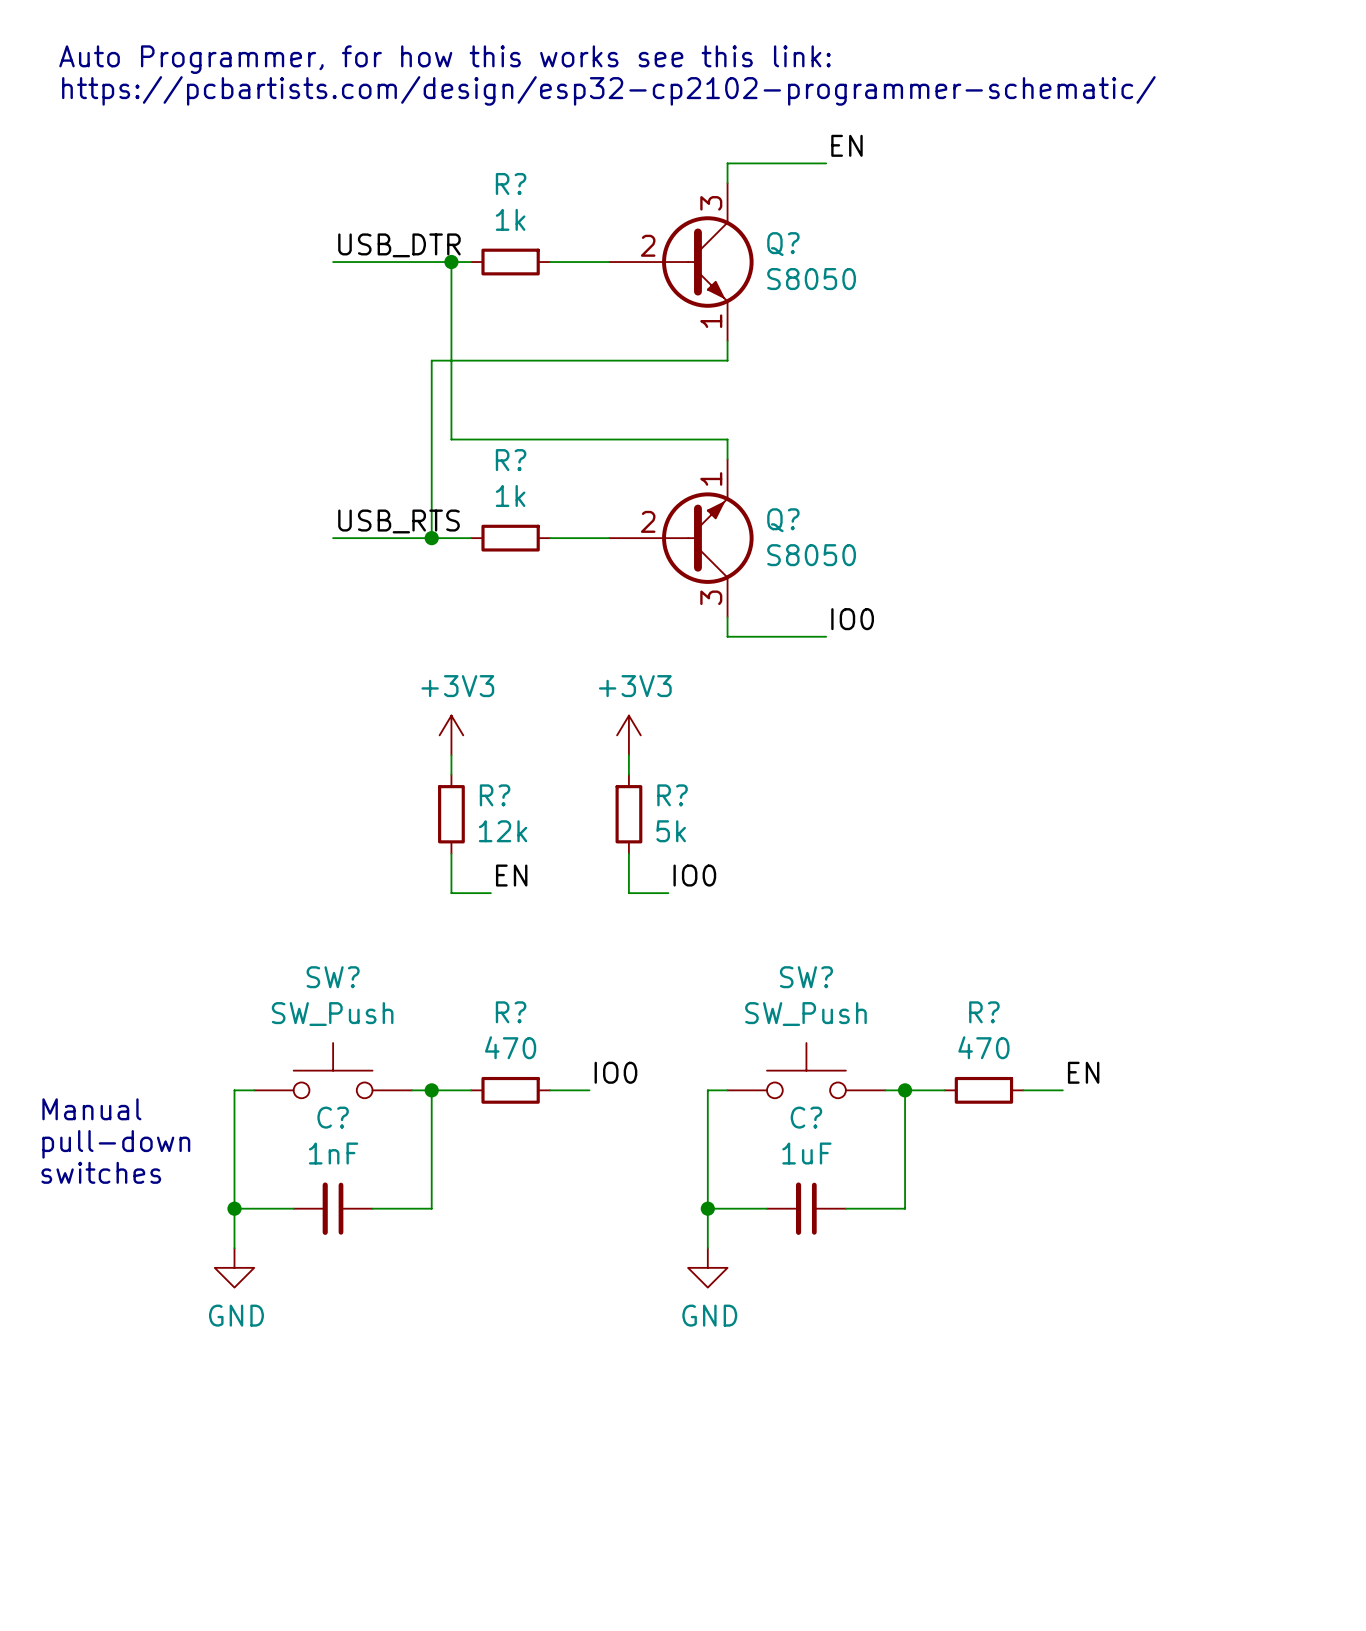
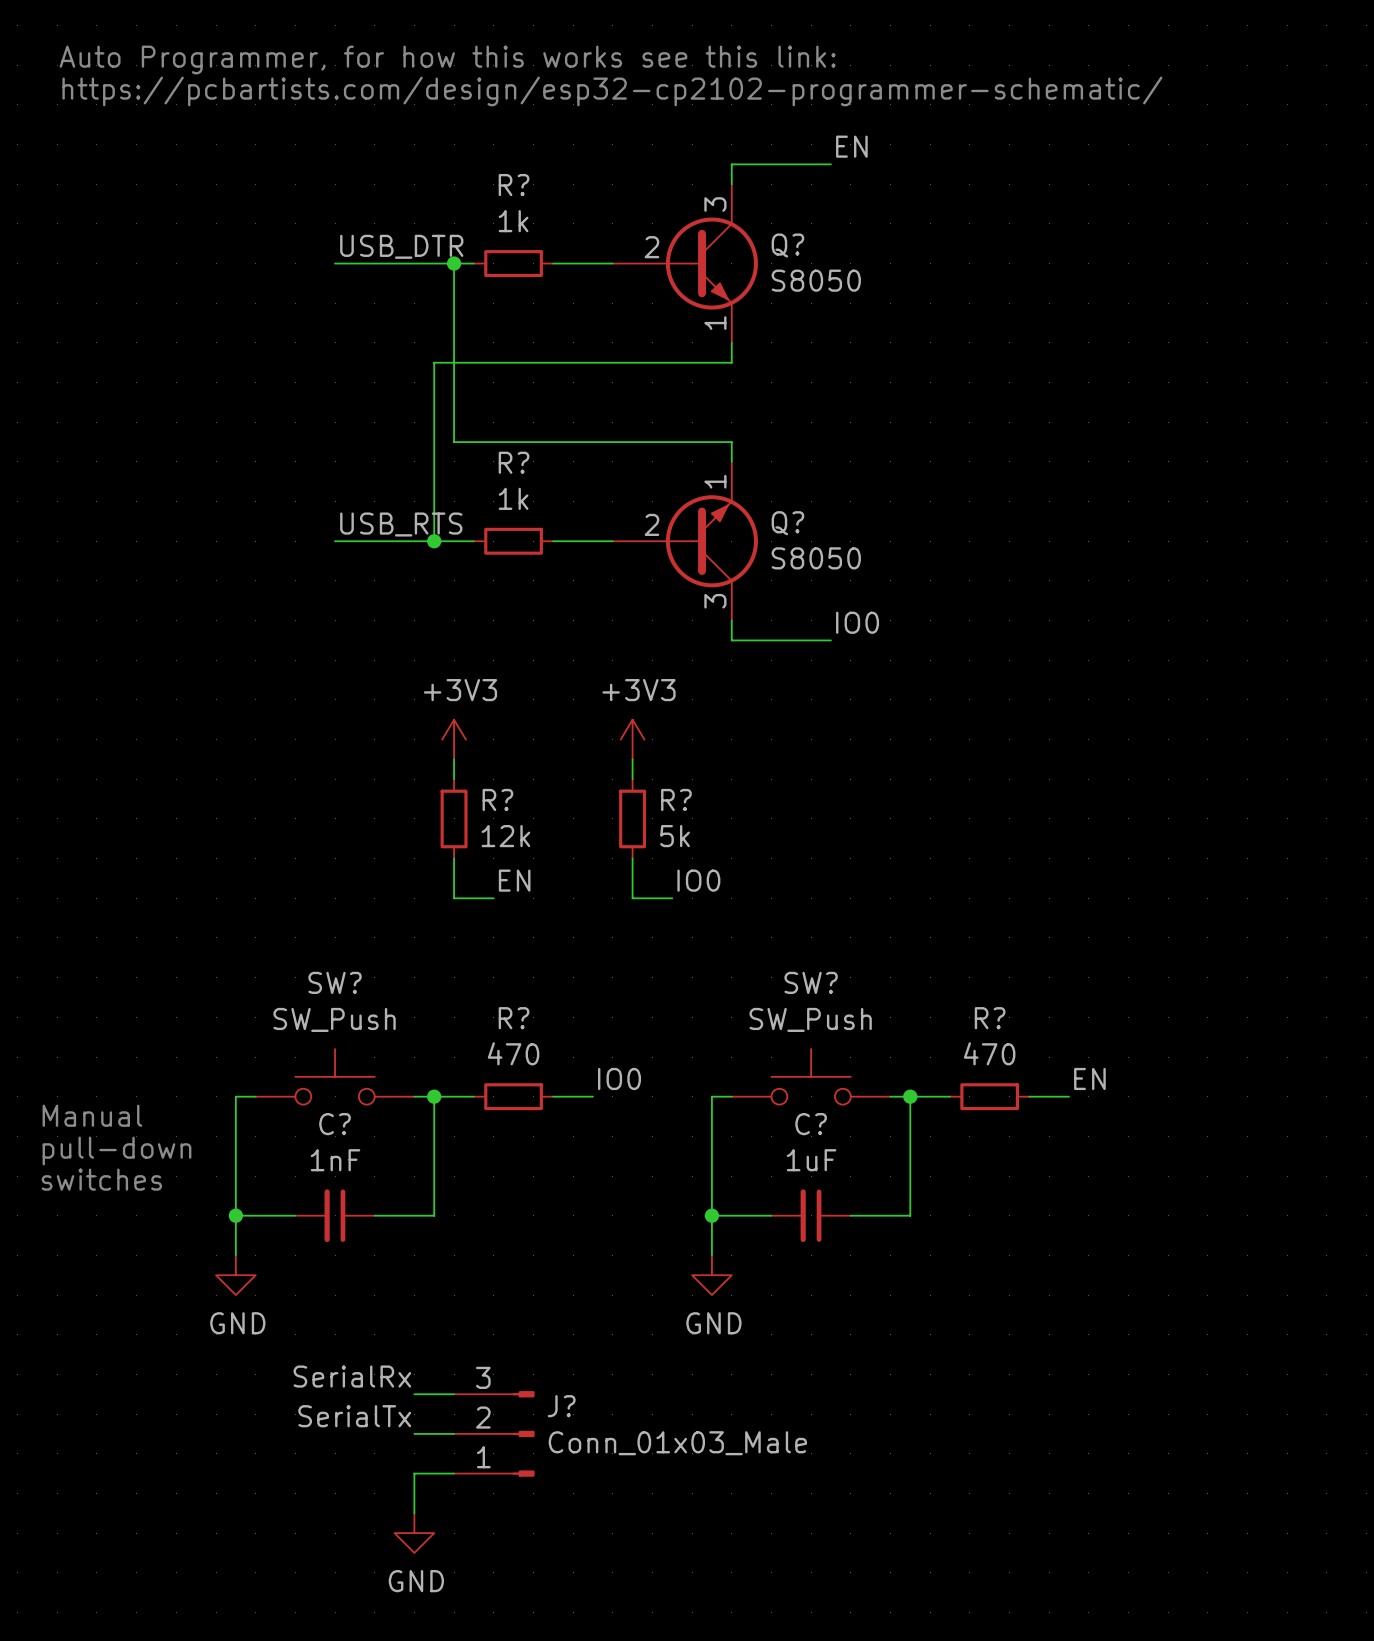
label: none -> SerialRx (352, 1376)
wire: none -> (414, 1394) (454, 1394)
label: none -> SerialTx (354, 1416)
wire: none -> (414, 1433) (454, 1433)
J?: none -> Conn_01x03_Male (494, 1433)
wire: none -> (454, 1473) (414, 1473) (414, 1513)
power symbol: none -> GND (414, 1533)

